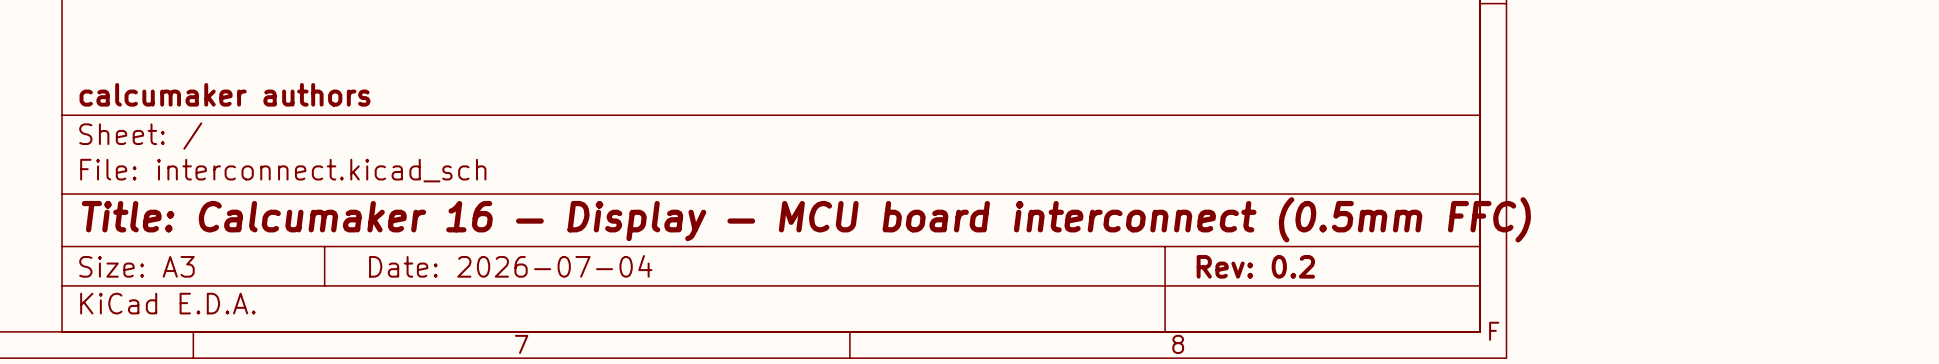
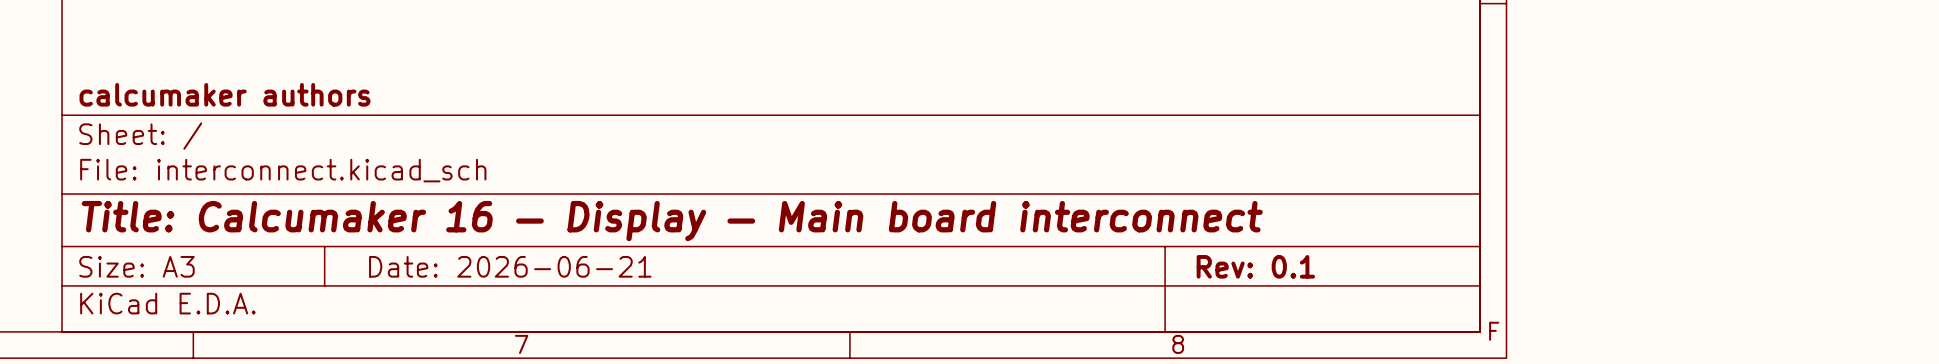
title block: Title: Calcumaker 16 — Display — MCU board interconnect (0.5mm FFC) (806, 219) -> Title: Calcumaker 16 — Display — Main board interconnect (672, 221)
title block: Date: 2026-07-04 (510, 266) -> Date: 2026-06-21 (510, 266)
title block: Rev: 0.2 (1255, 266) -> Rev: 0.1 (1255, 266)

